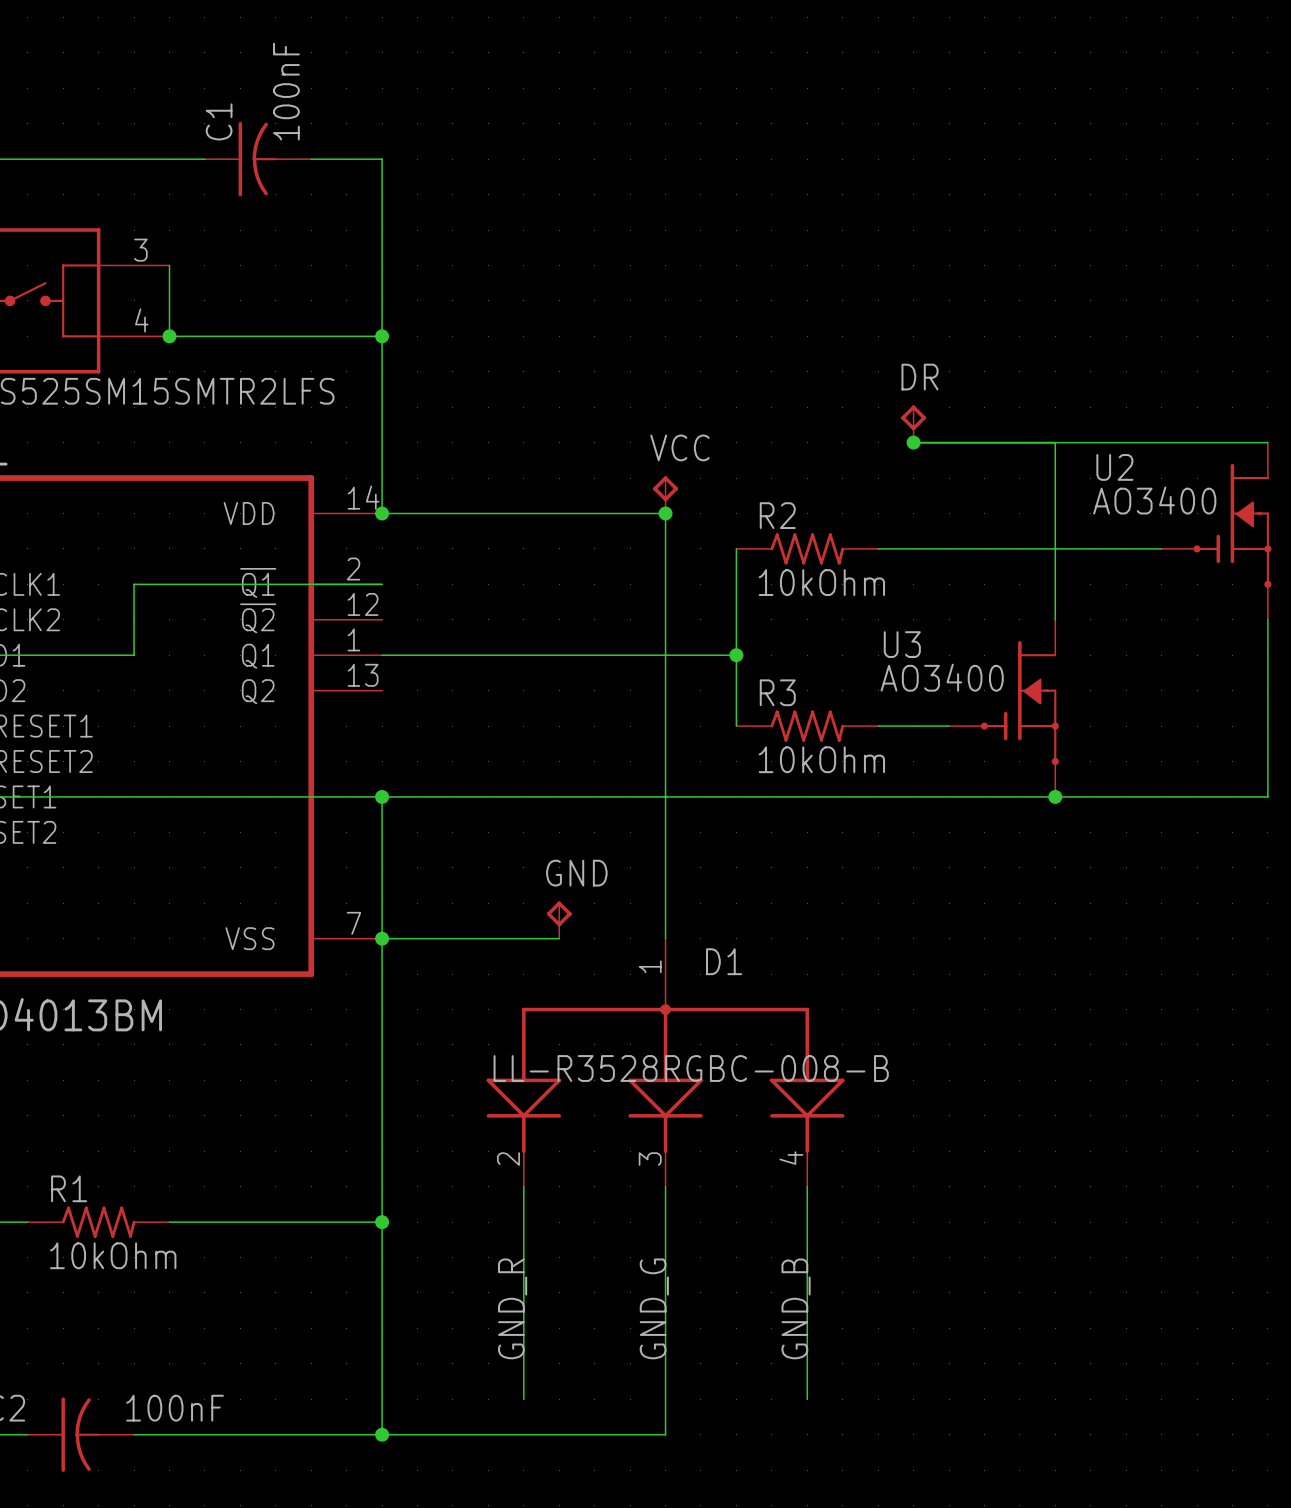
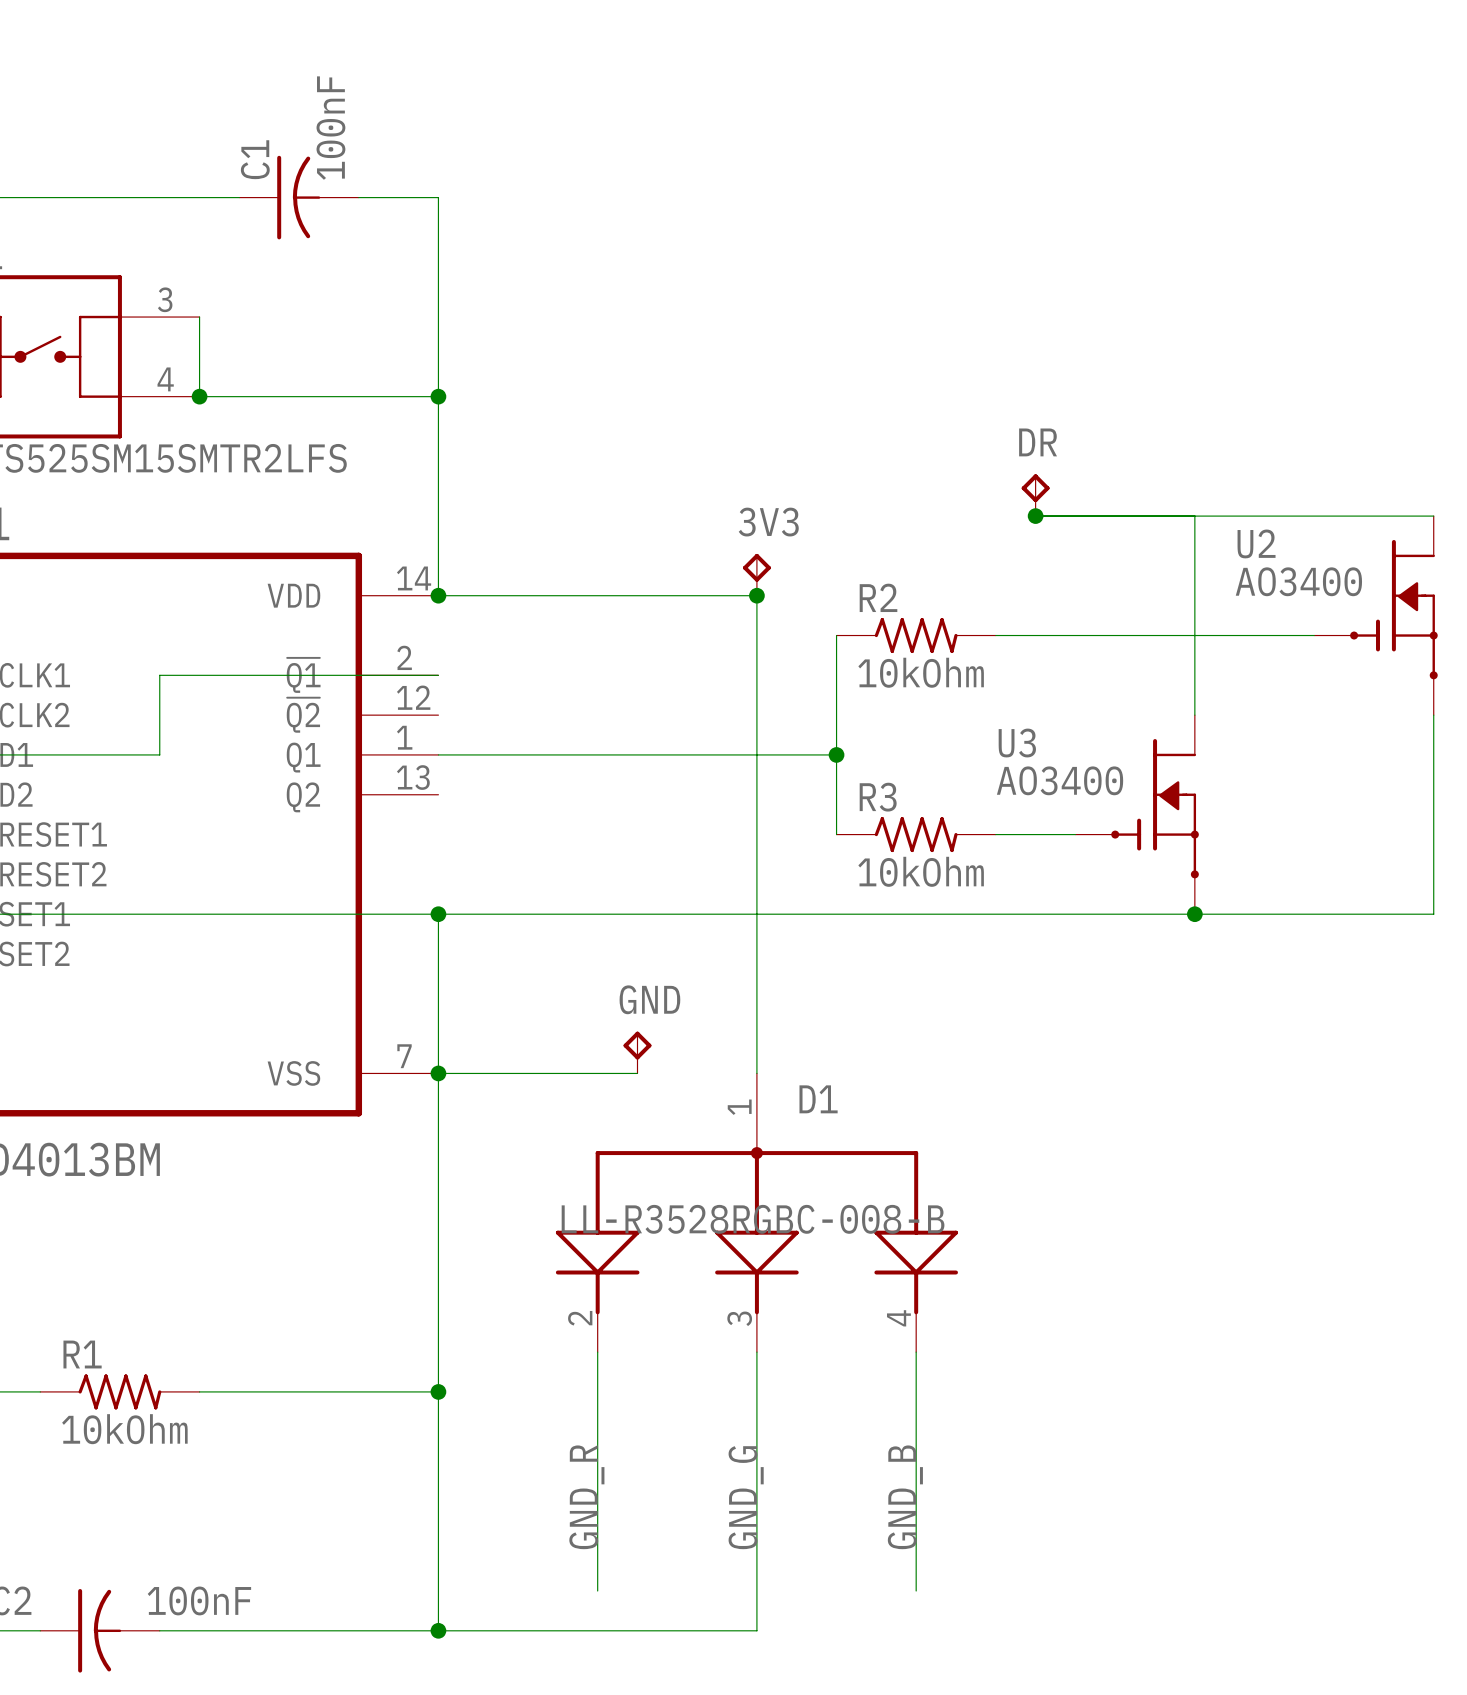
VCC name: VCC (679, 447) -> 3V3 (768, 522)

